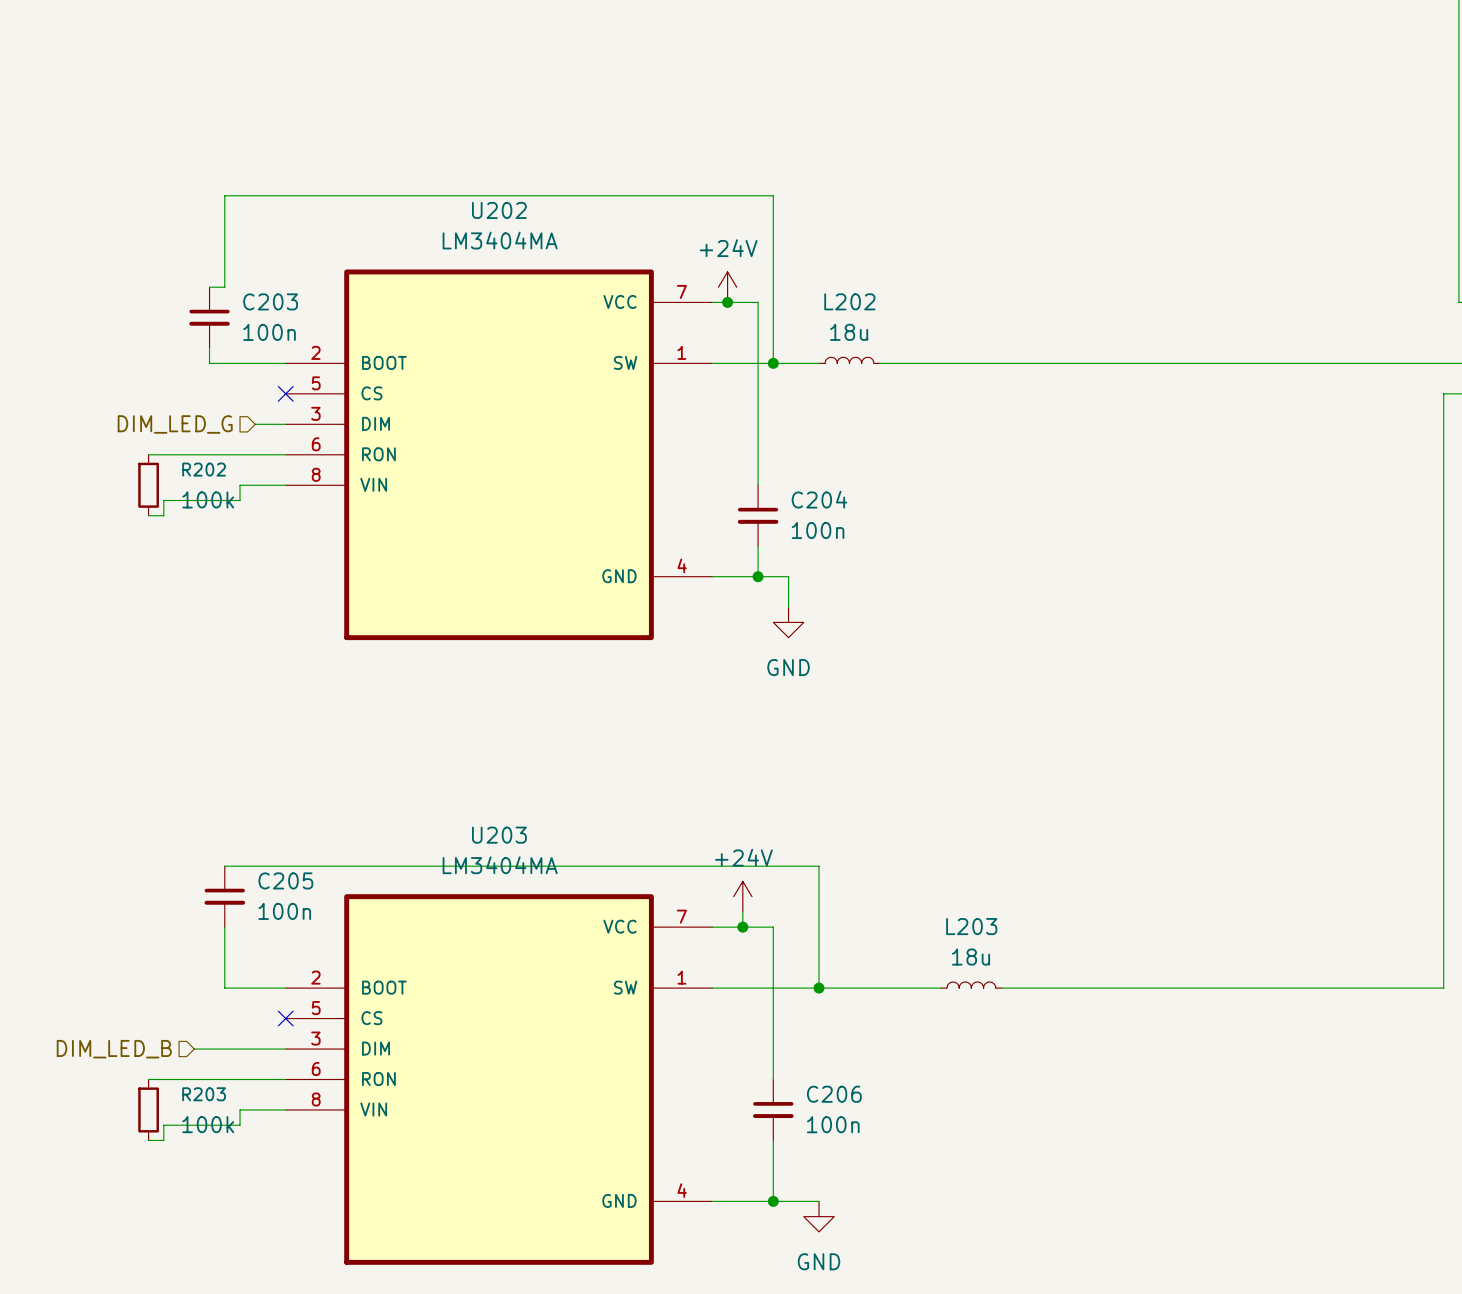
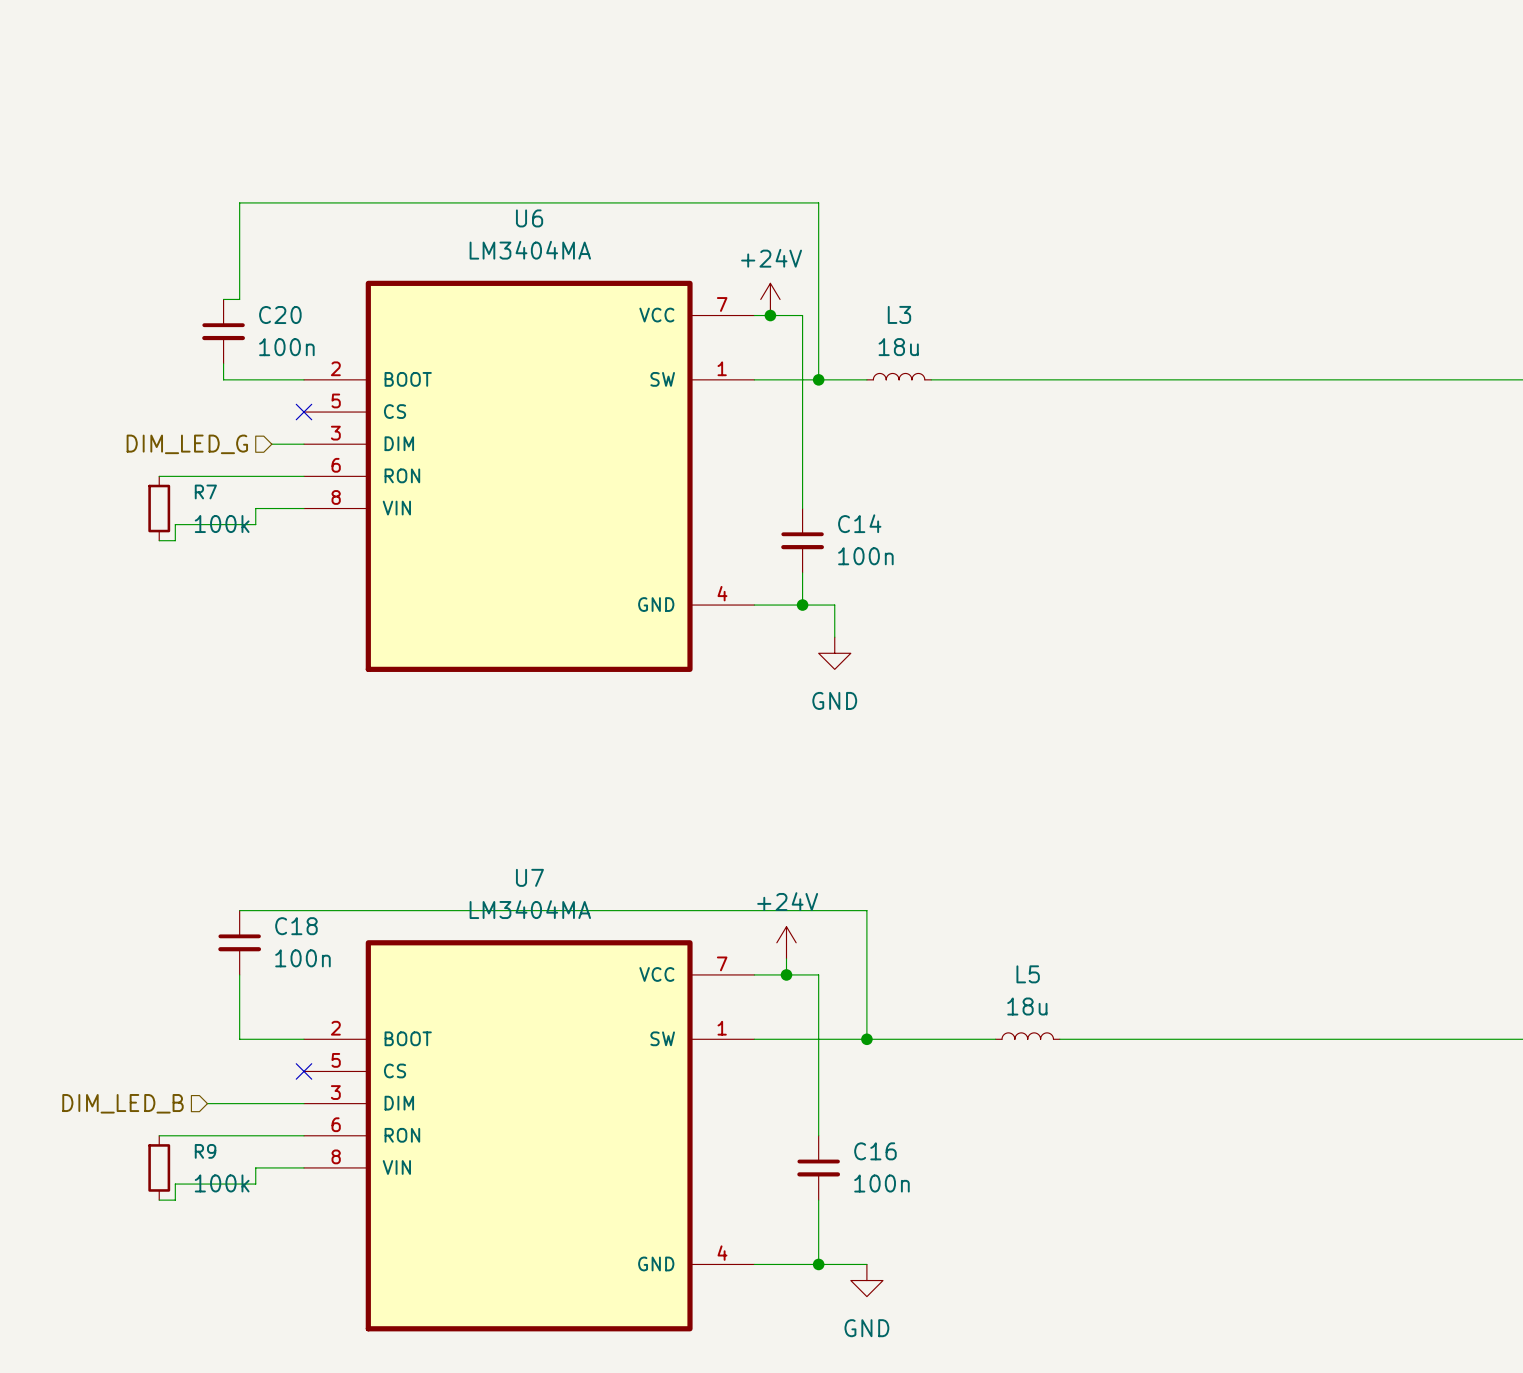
U202 name: U202 (499, 210) -> U6 (529, 218)
C203 name: C203 (270, 301) -> C20 (280, 315)
L202 name: L202 (849, 301) -> L3 (899, 314)
R202 name: R202 (204, 469) -> R7 (205, 491)
C204 name: C204 (819, 499) -> C14 (859, 523)
U203 name: U203 (499, 835) -> U7 (529, 877)
C205 name: C205 (285, 880) -> C18 (296, 926)
L203 name: L203 (971, 926) -> L5 (1028, 974)
R203 name: R203 (204, 1094) -> R9 (205, 1151)
C206 name: C206 (834, 1094) -> C16 (875, 1151)

